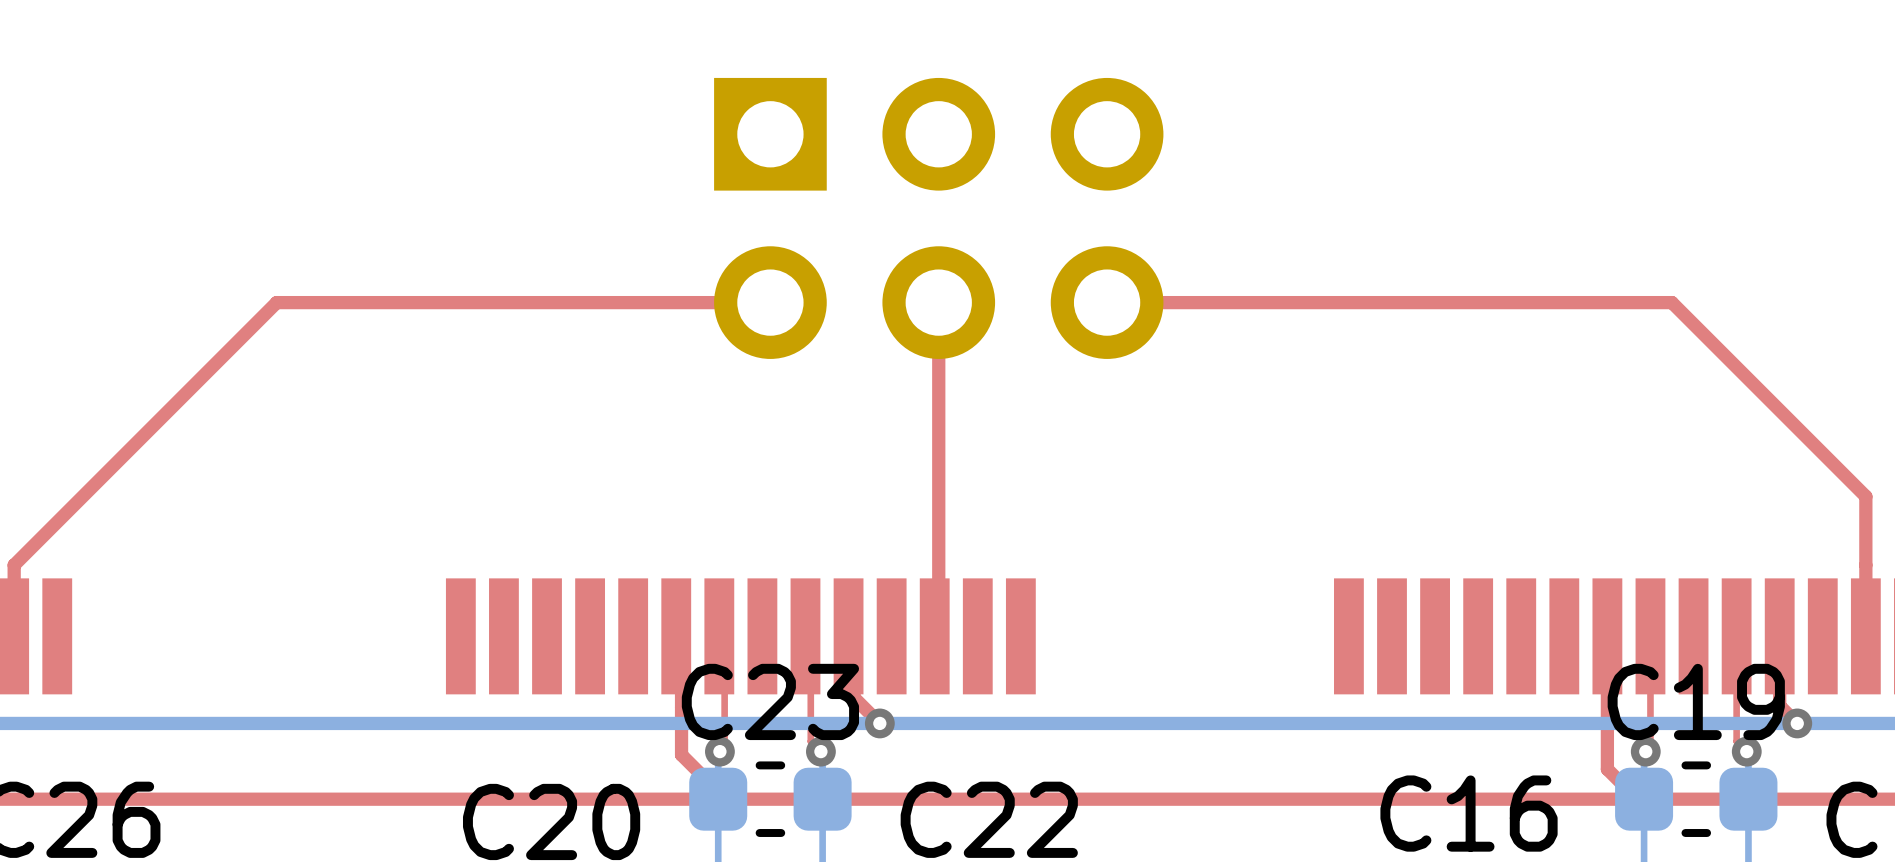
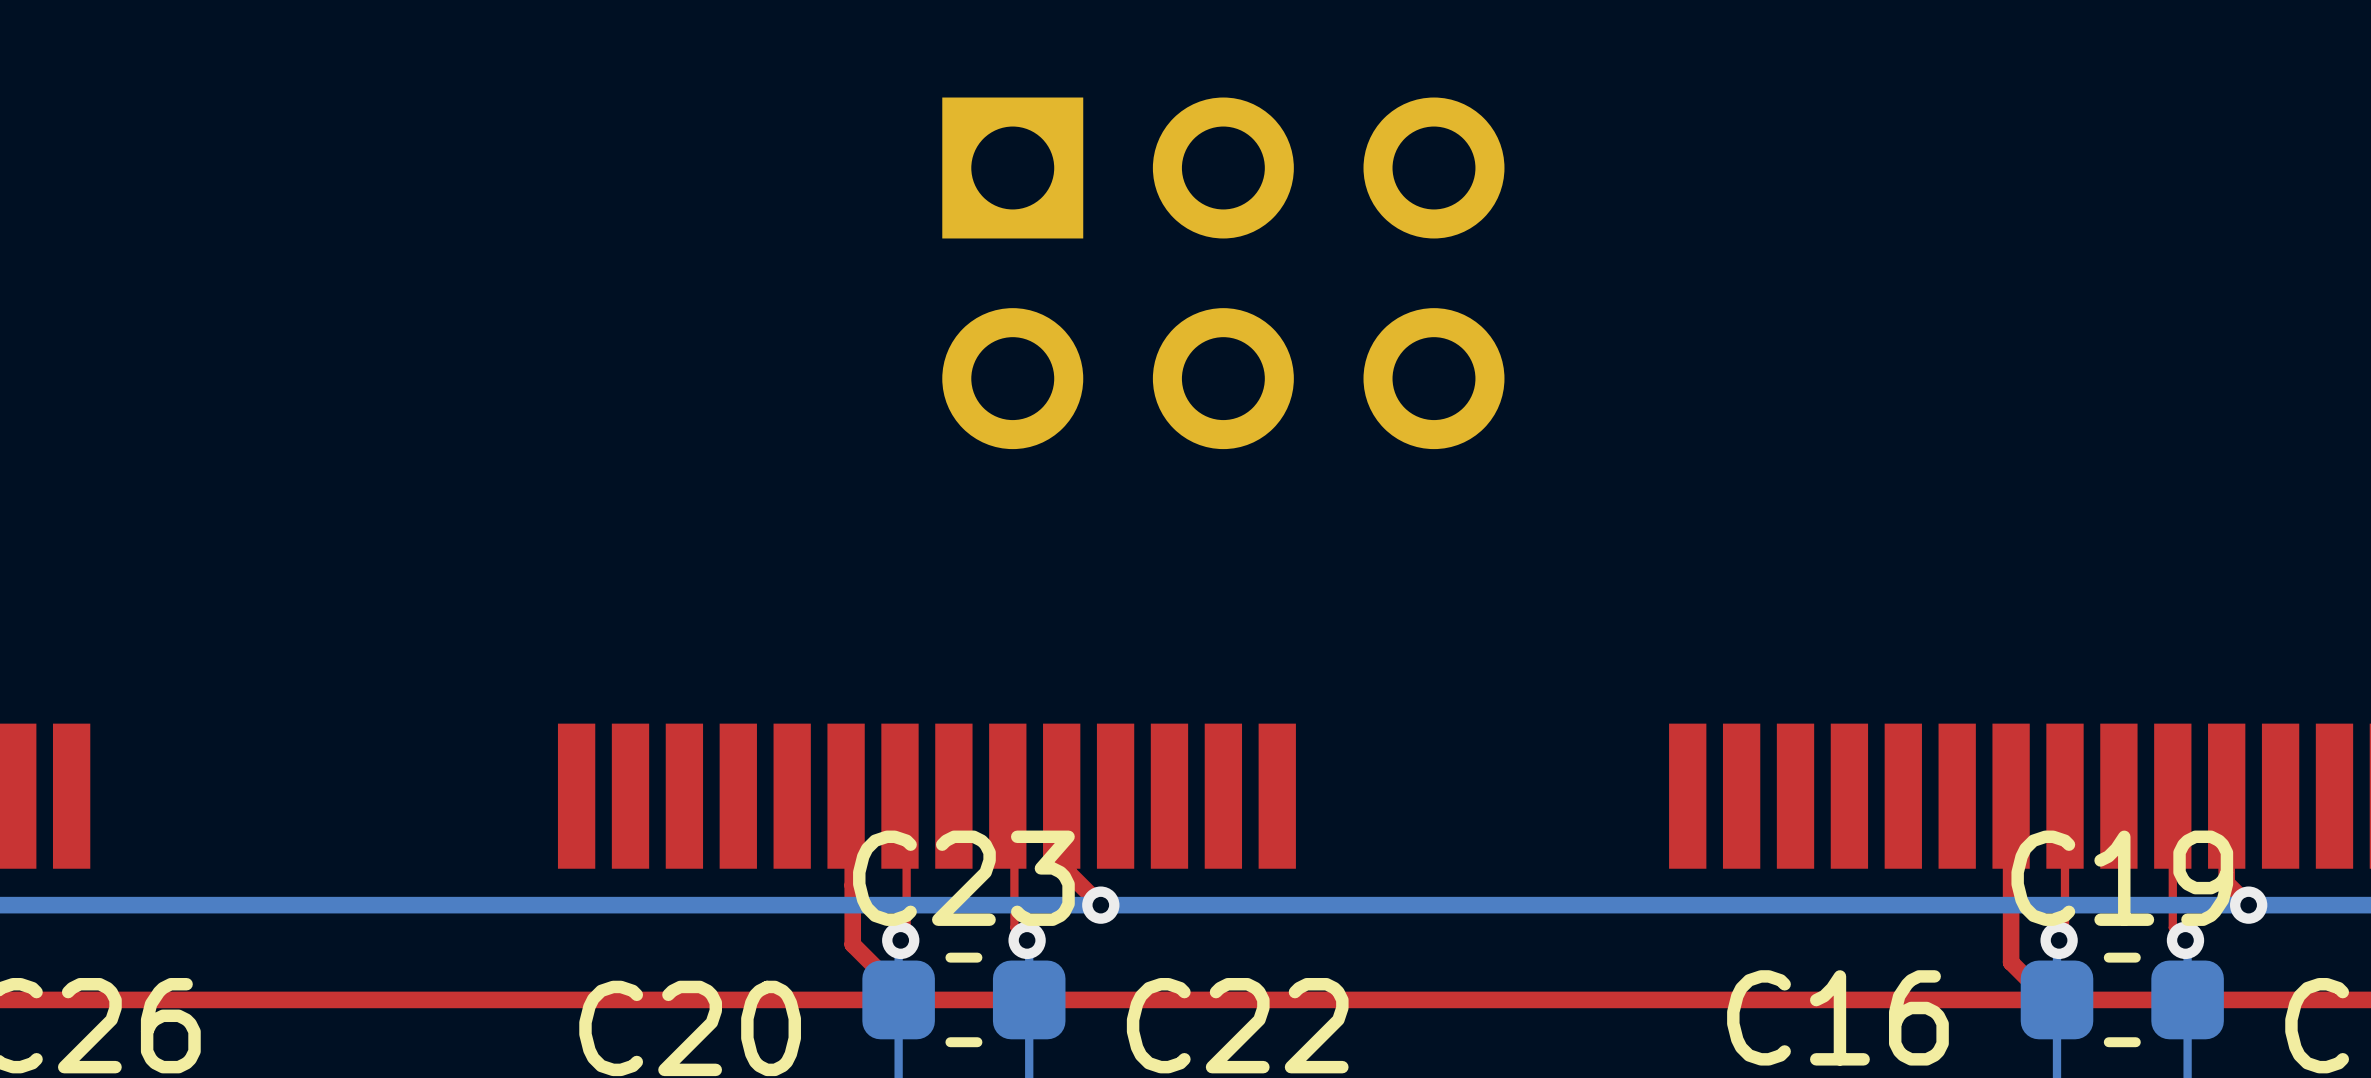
part position: (938, 218) -> (1223, 273)
top track: (770, 302) (276, 302) (14, 565) (14, 636) -> none
top track: (938, 302) (938, 635) -> none
top track: (1107, 302) (1671, 302) (1865, 496) (1865, 636) -> none

